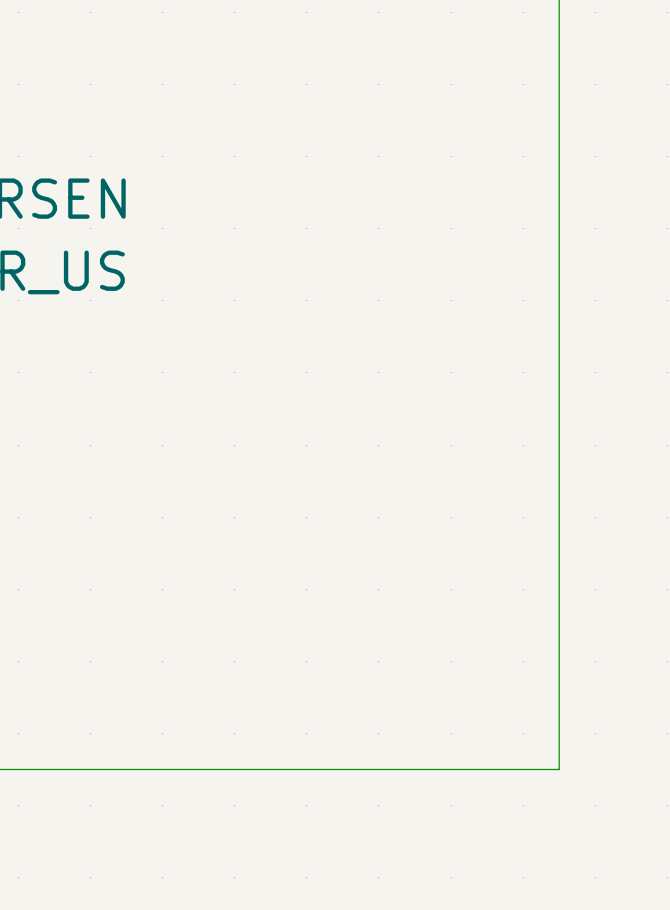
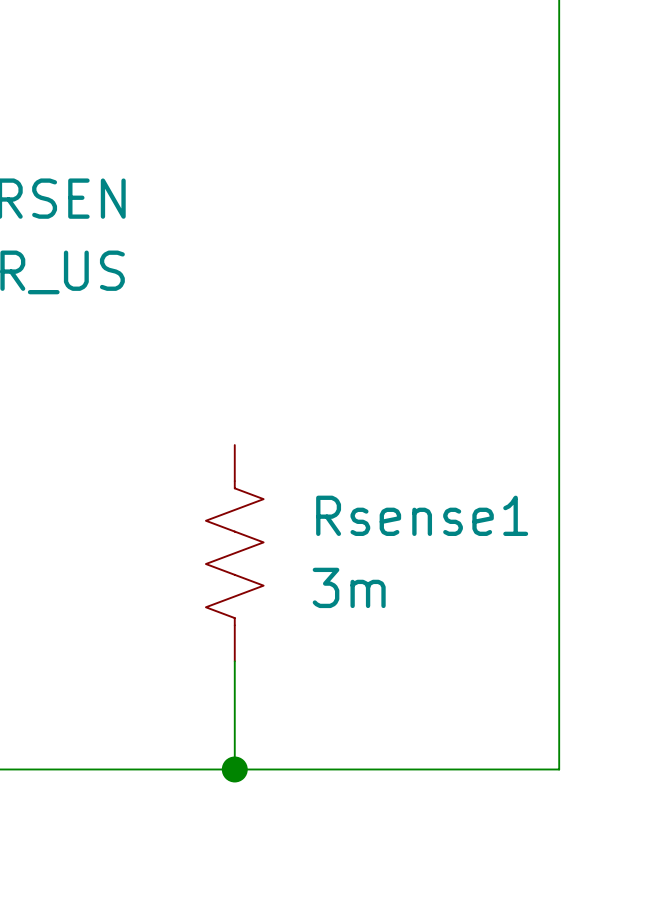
Rsense1: none -> 3m (234, 553)
wire: none -> (234, 661) (234, 769)
junction: none -> (234, 769)

